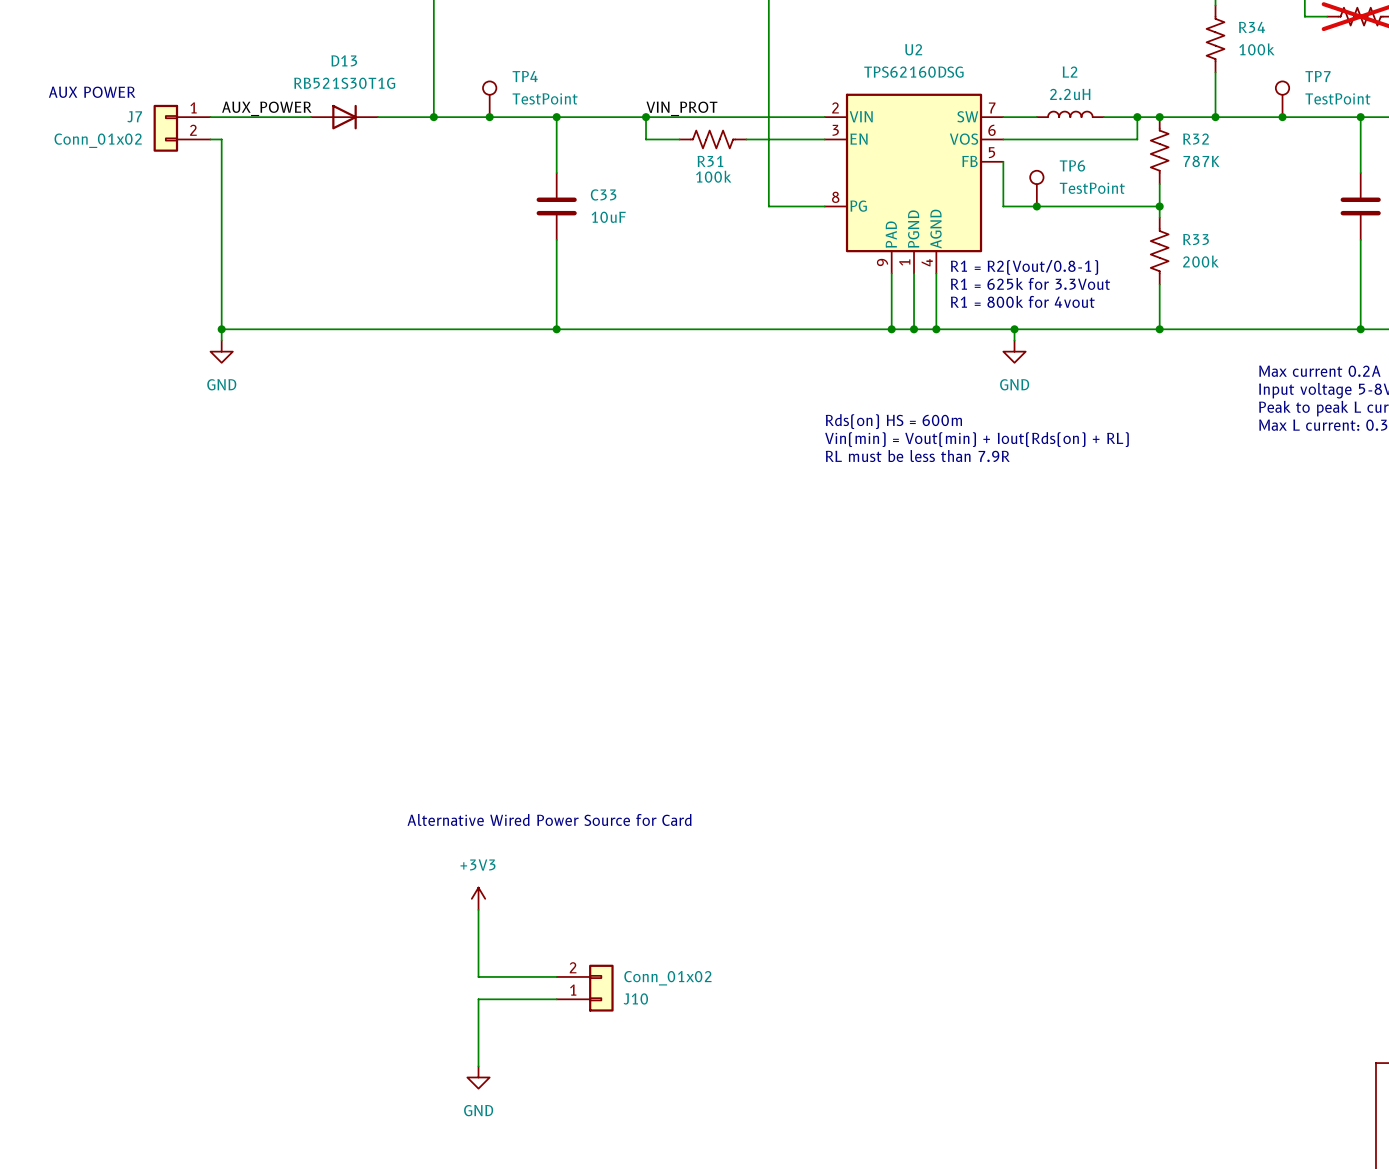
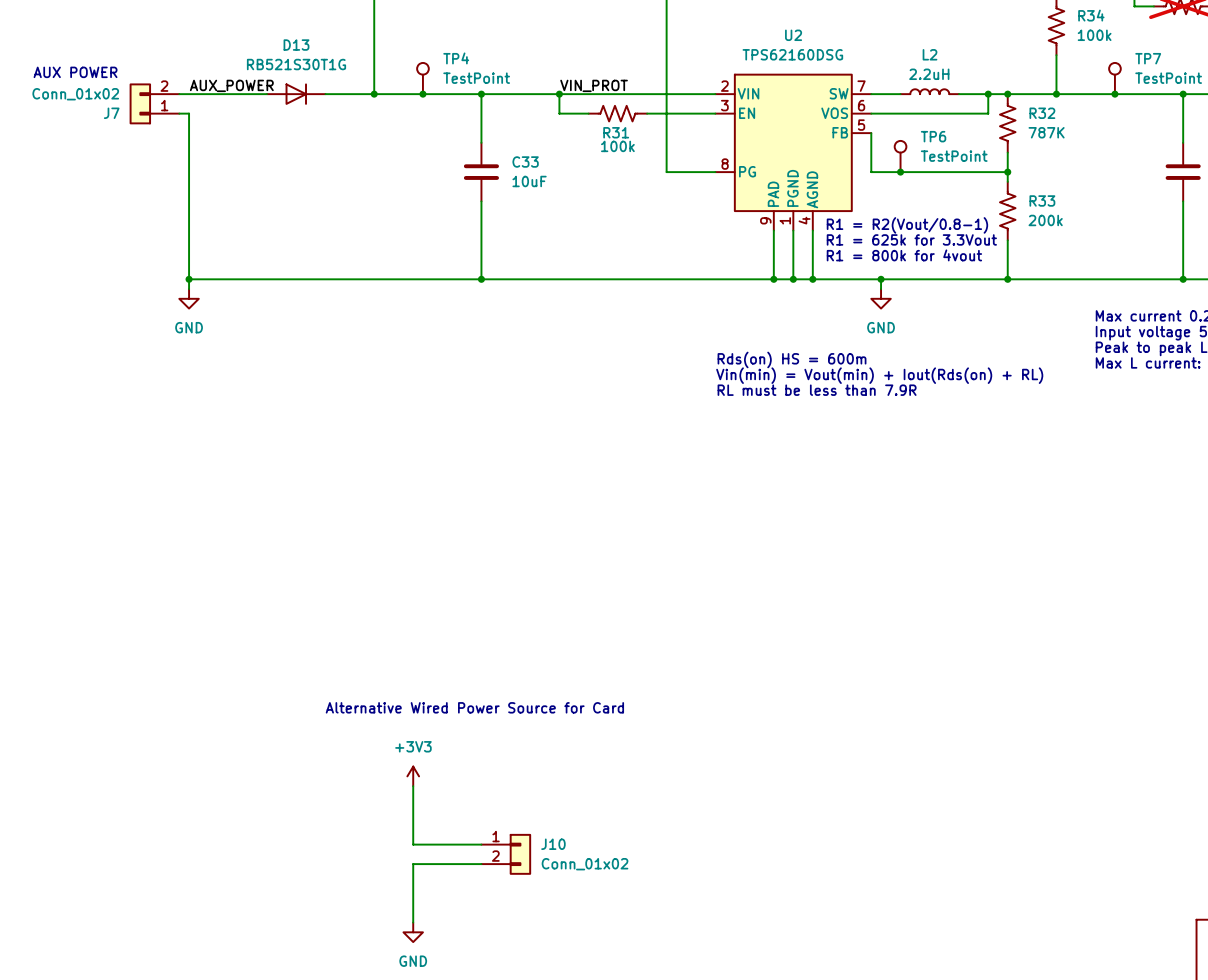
J7 flip: as is (165, 128) -> up-down (140, 103)
J10 flip: as is (601, 988) -> up-down (520, 854)

